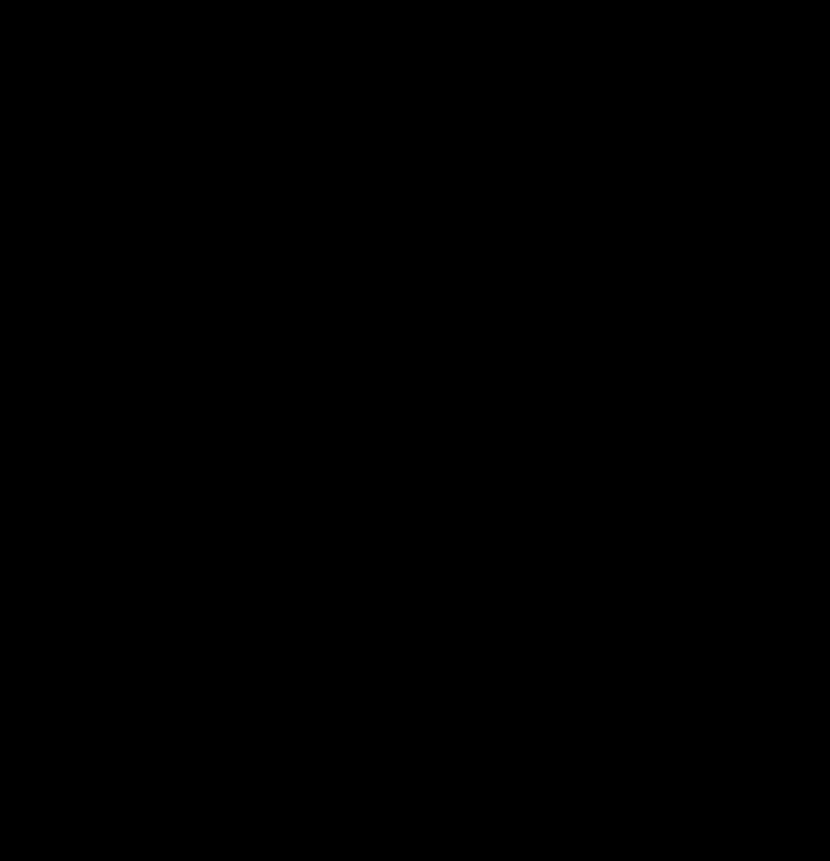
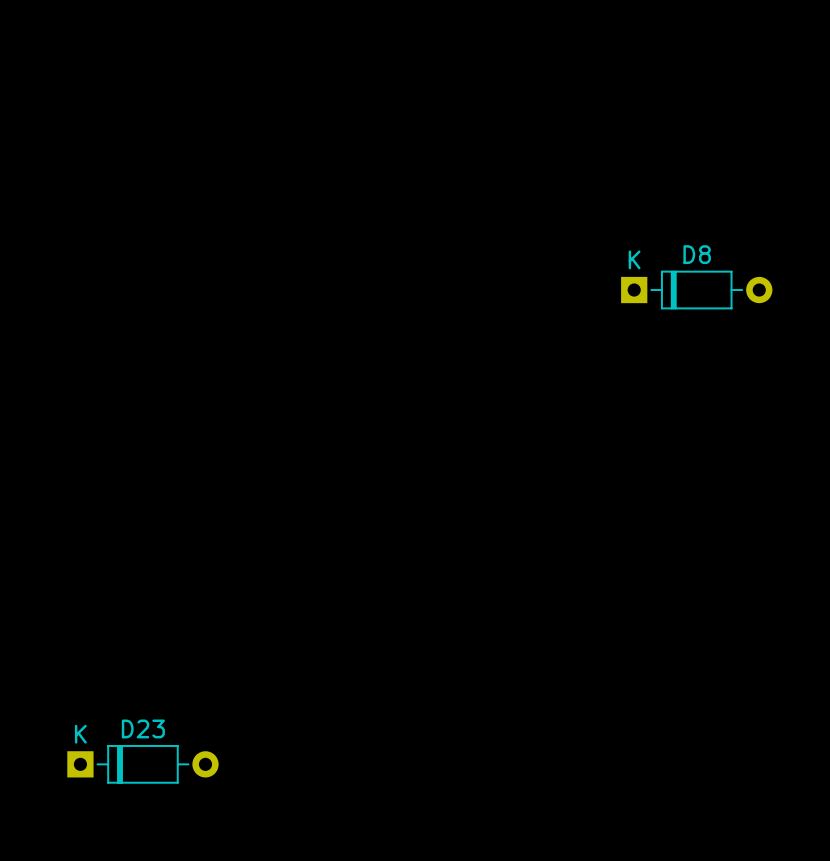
D8: none -> (696, 290)
D23: none -> (142, 764)

